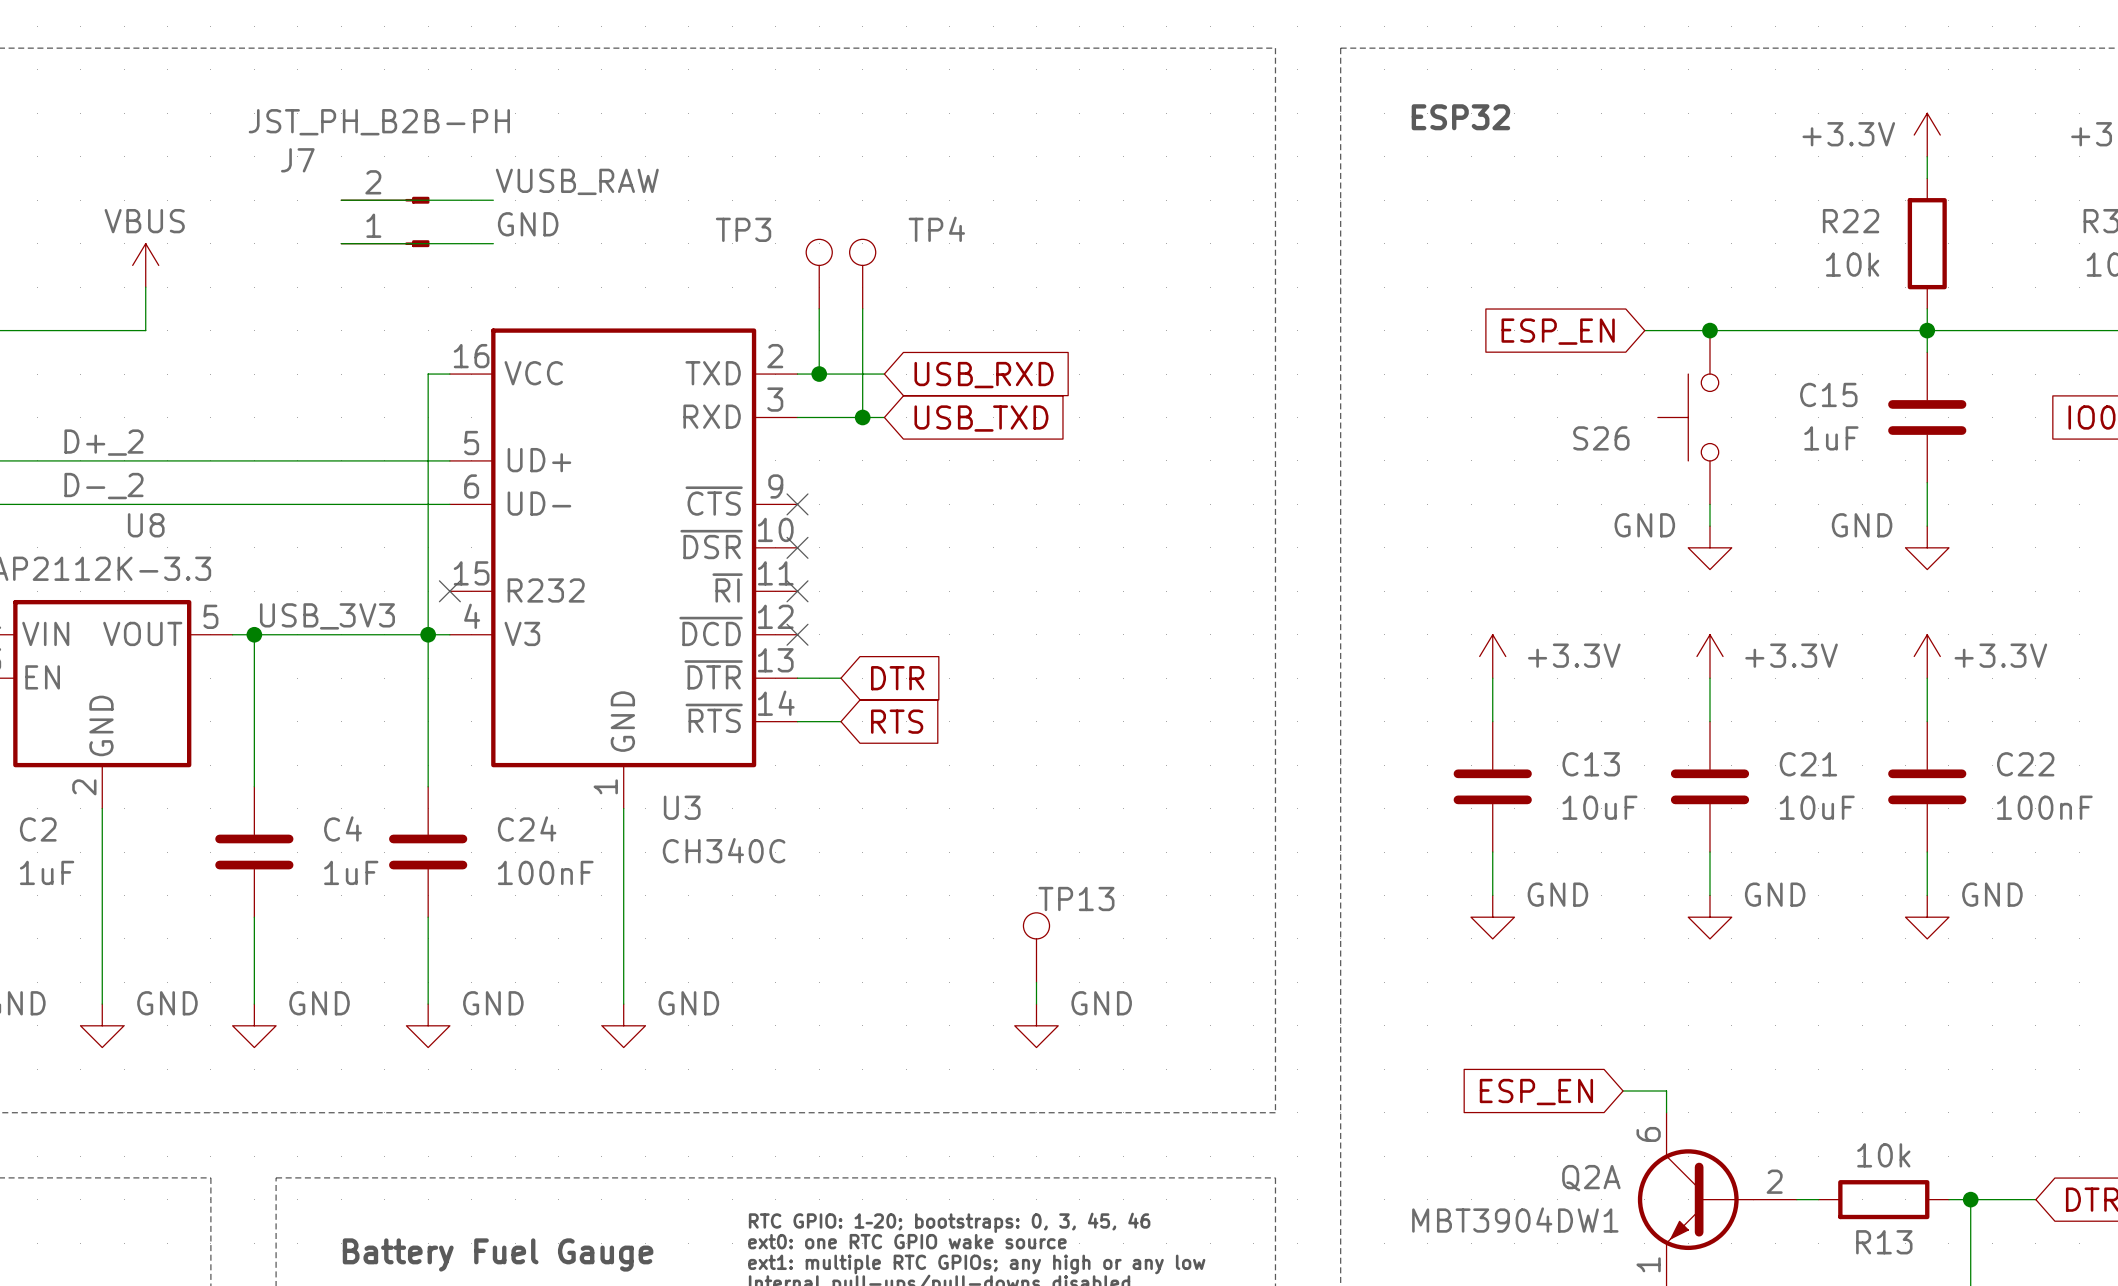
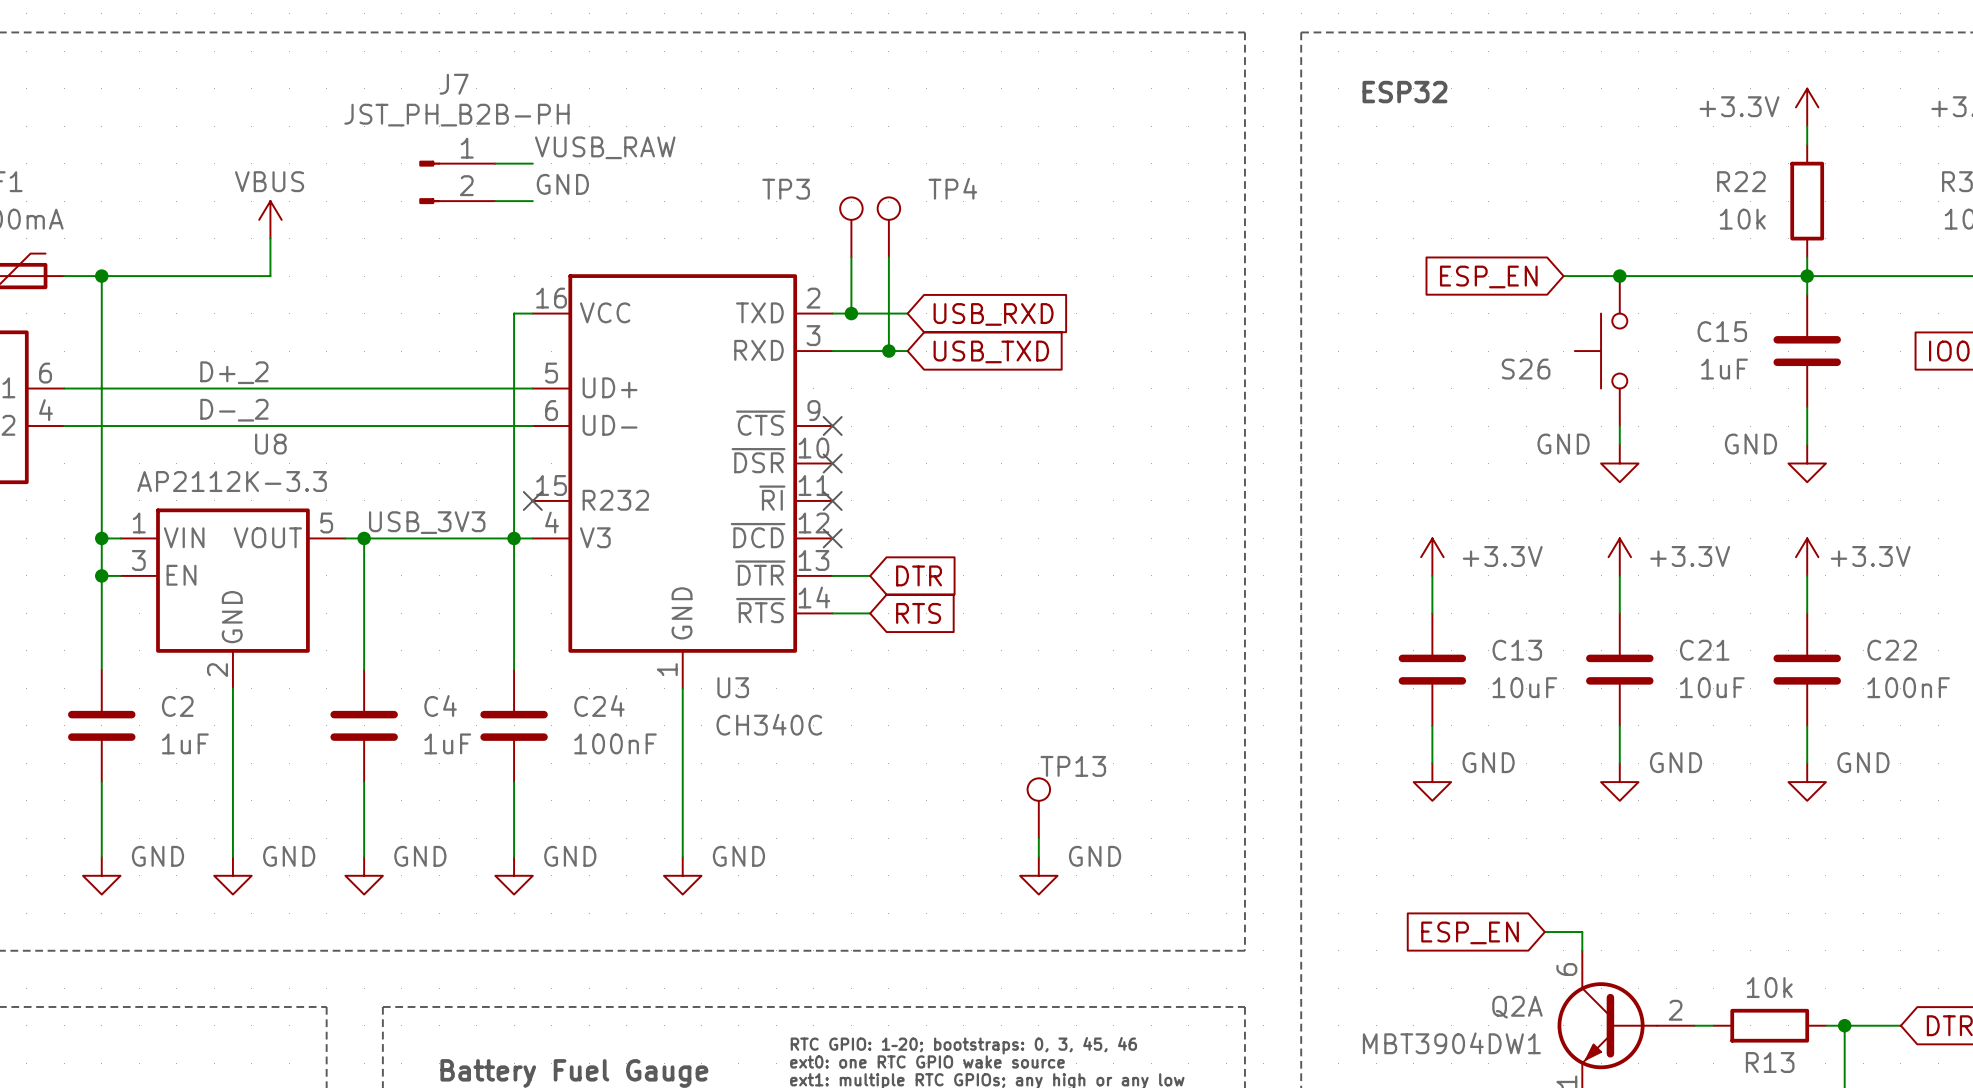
J7 name position: J7 (297, 160) -> J7 (454, 84)
label position: VUSB_RAW (577, 181) -> VUSB_RAW (605, 147)
wire: (449, 200) (493, 200) -> none
J7 rotation: 0° (417, 221) -> 180° (429, 182)
label position: GND (528, 224) -> GND (562, 184)
wire: (449, 243) (493, 243) -> none

